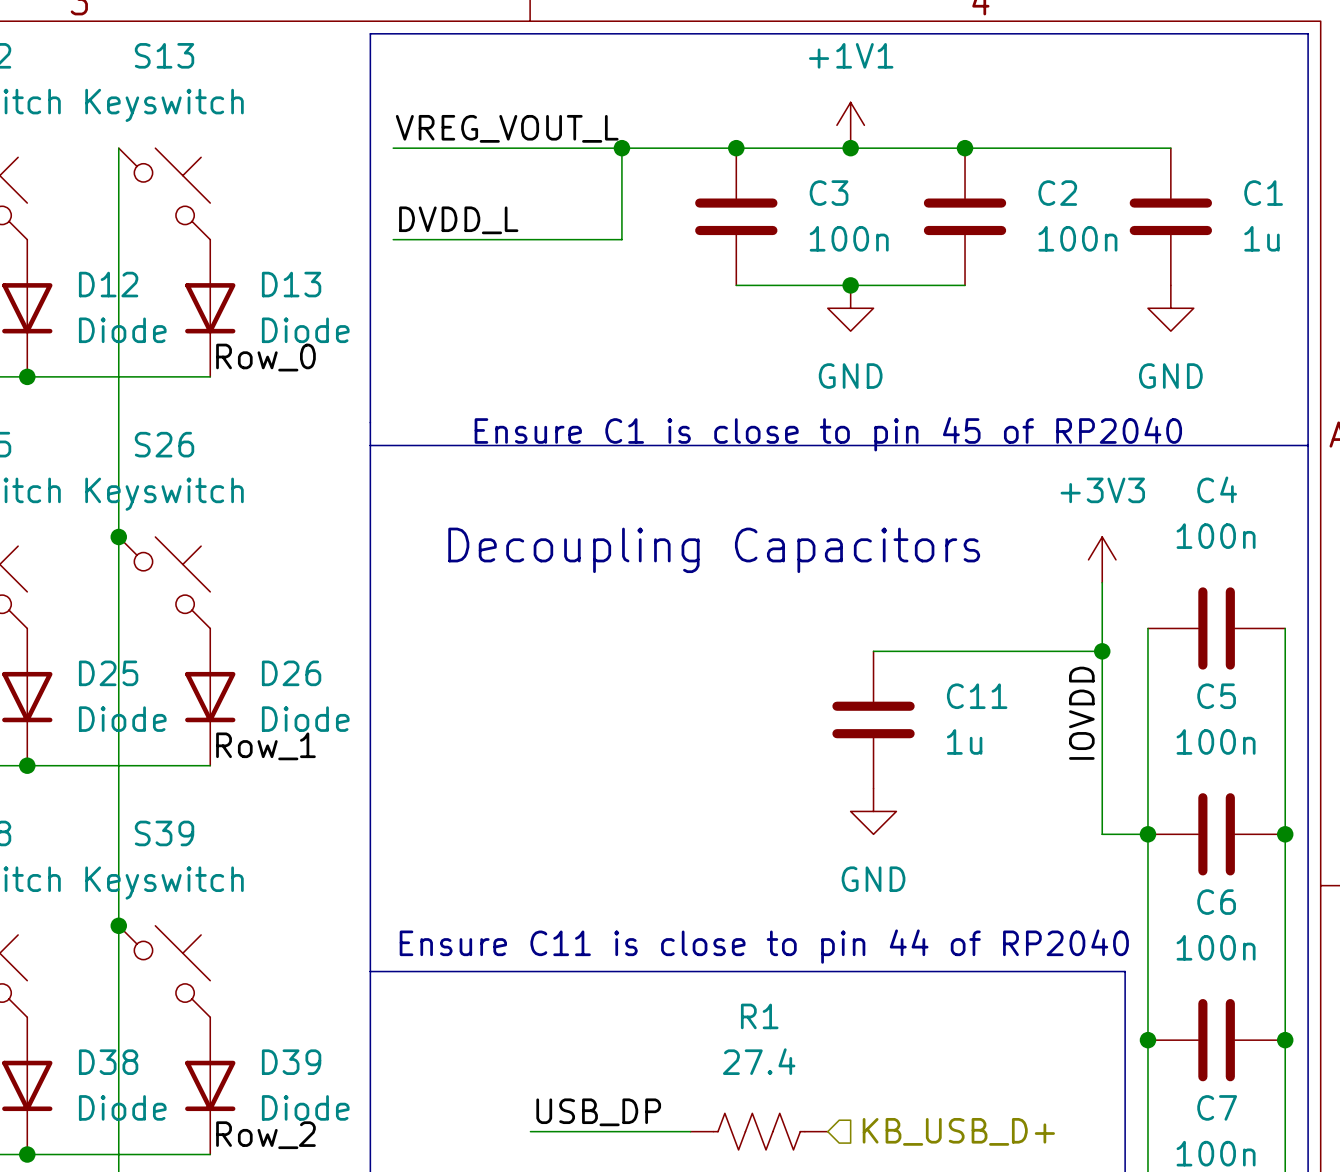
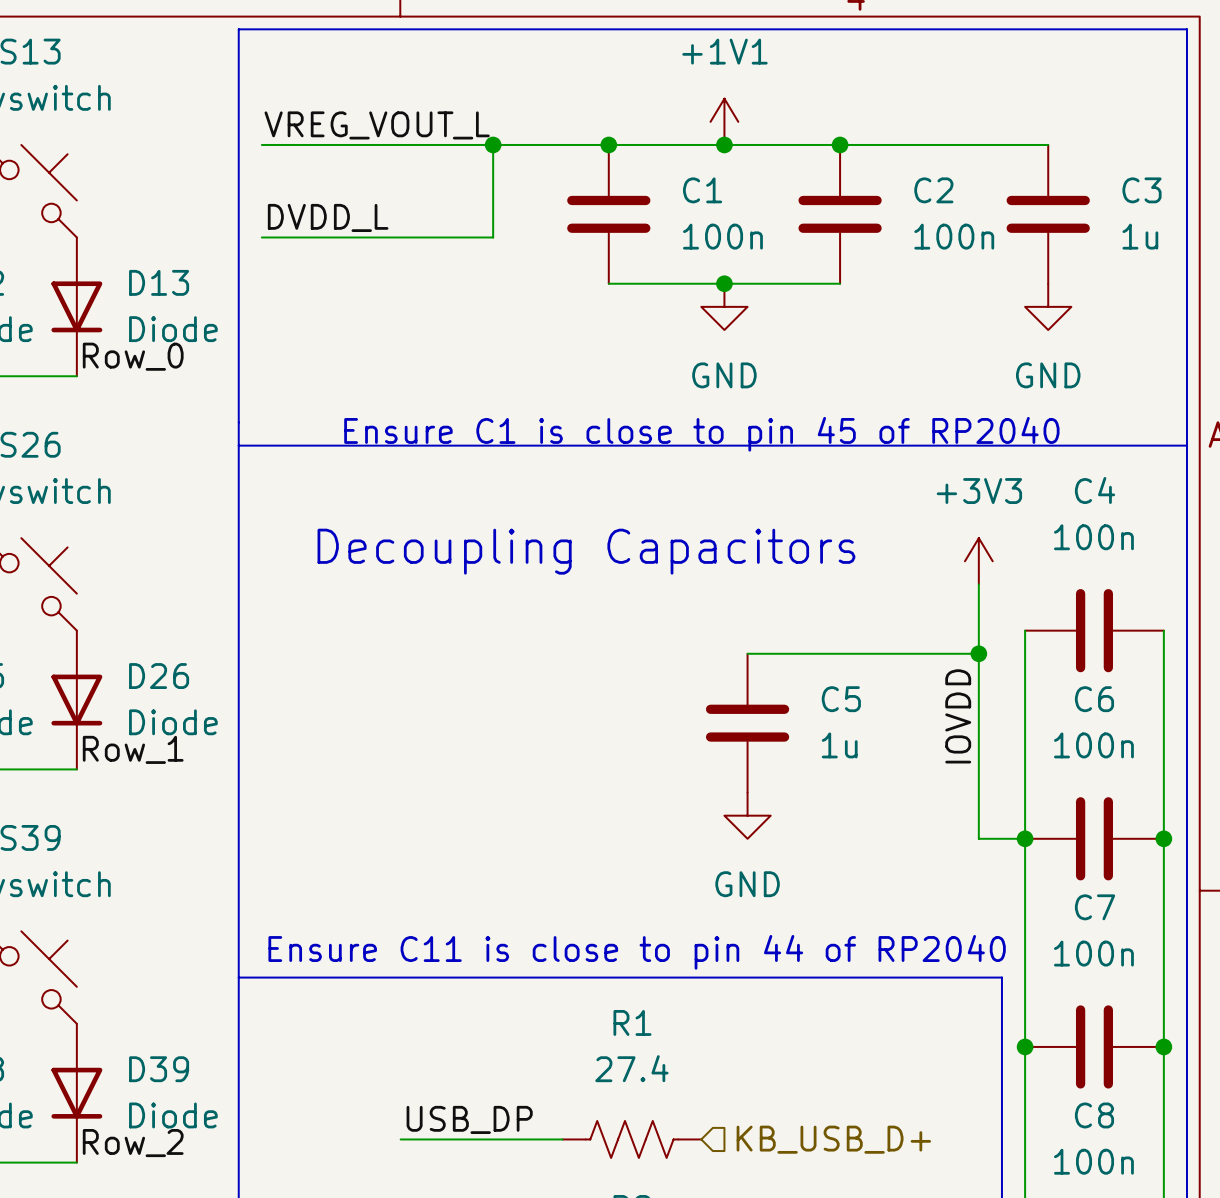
C3 name: C3 (829, 193) -> C1 (702, 190)
C1 name: C1 (1263, 193) -> C3 (1142, 190)
C11 name: C11 (977, 696) -> C5 (841, 699)
C5 name: C5 (1216, 696) -> C6 (1094, 699)
C6 name: C6 (1216, 902) -> C7 (1095, 907)
C7 name: C7 (1217, 1107) -> C8 (1094, 1115)

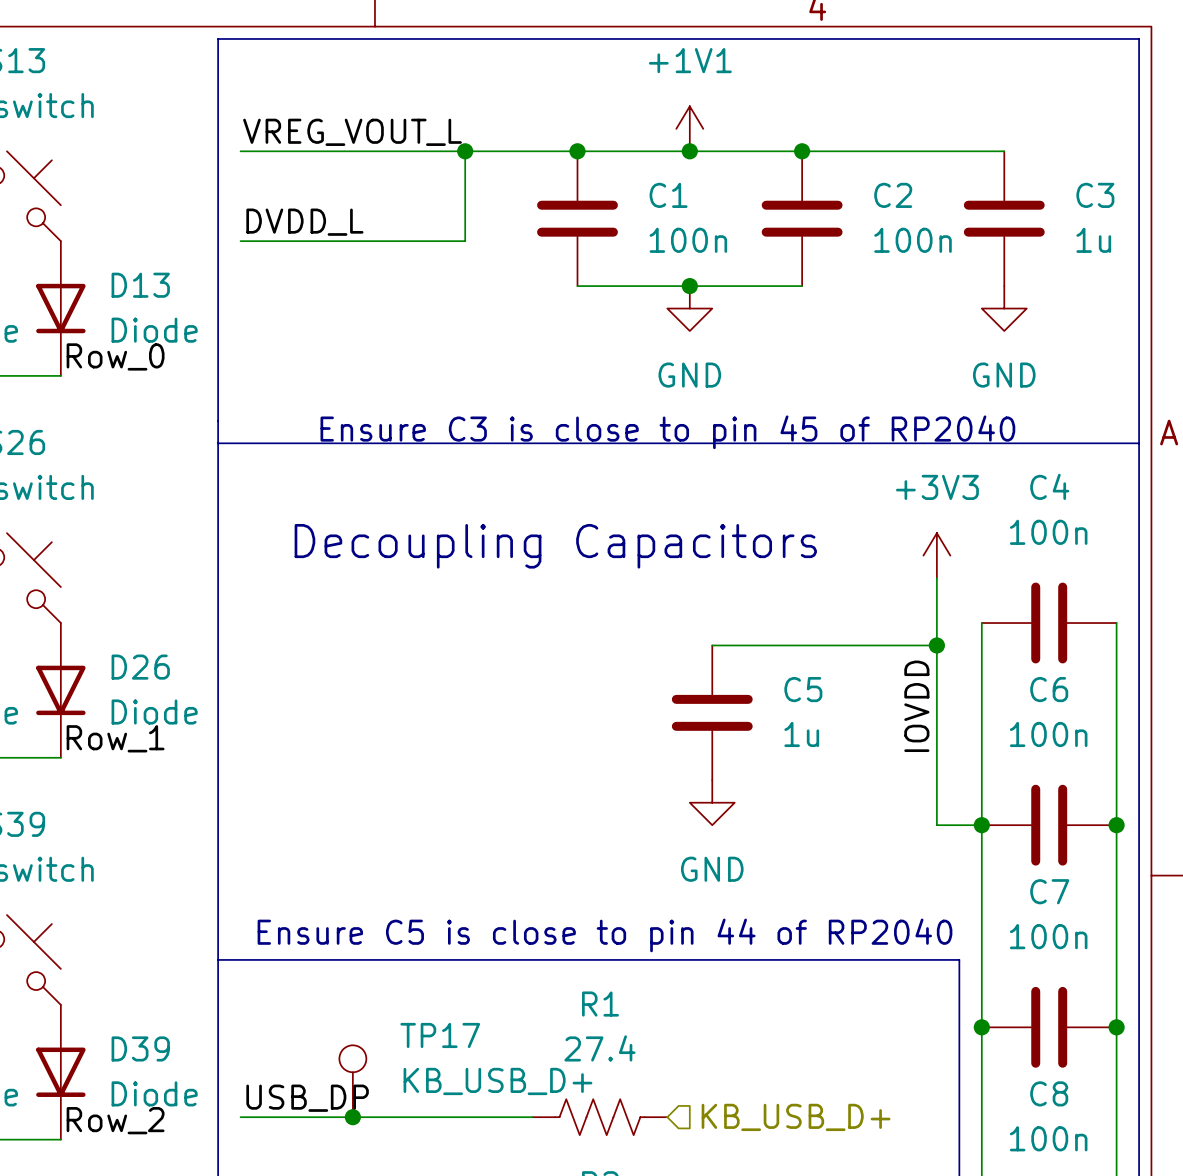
text: Ensure C1 is close to pin 45 of RP2040 (701, 434) -> Ensure C3 is close to pin 45 of RP2040 (667, 432)
text: Ensure C11 is close to pin 44 of RP2040 (637, 952) -> Ensure C5 is close to pin 44 of RP2040 (604, 935)
TP17: none -> KB_USB_D+ (352, 1081)
label position: USB_DP (469, 1119) -> USB_DP (307, 1098)
wire: none -> (240, 1117) (375, 1117)
junction: none -> (352, 1117)

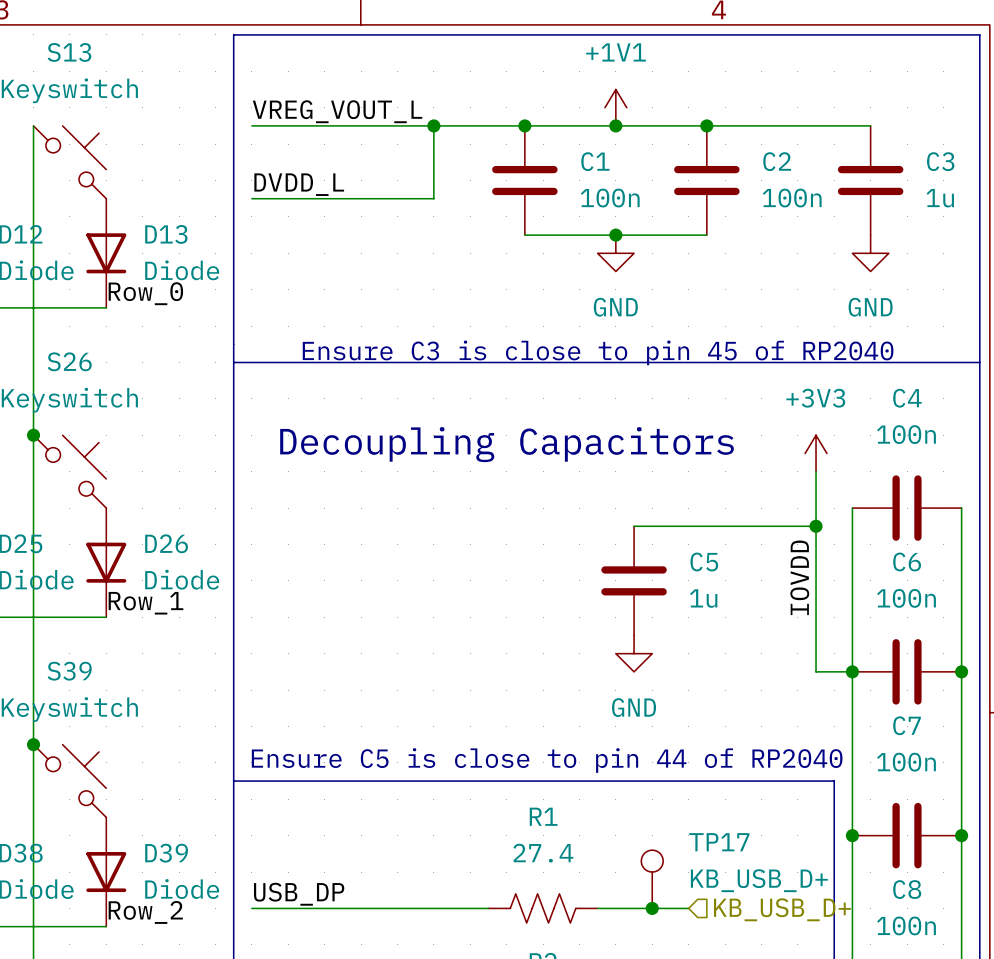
TP17 position: (352, 1081) -> (652, 879)
junction: (352, 1117) -> none
wire: none -> (597, 908) (688, 908)
junction: none -> (652, 908)
hierarchical label position: KB_USB_D+ (796, 1117) -> KB_USB_D+ (782, 909)

